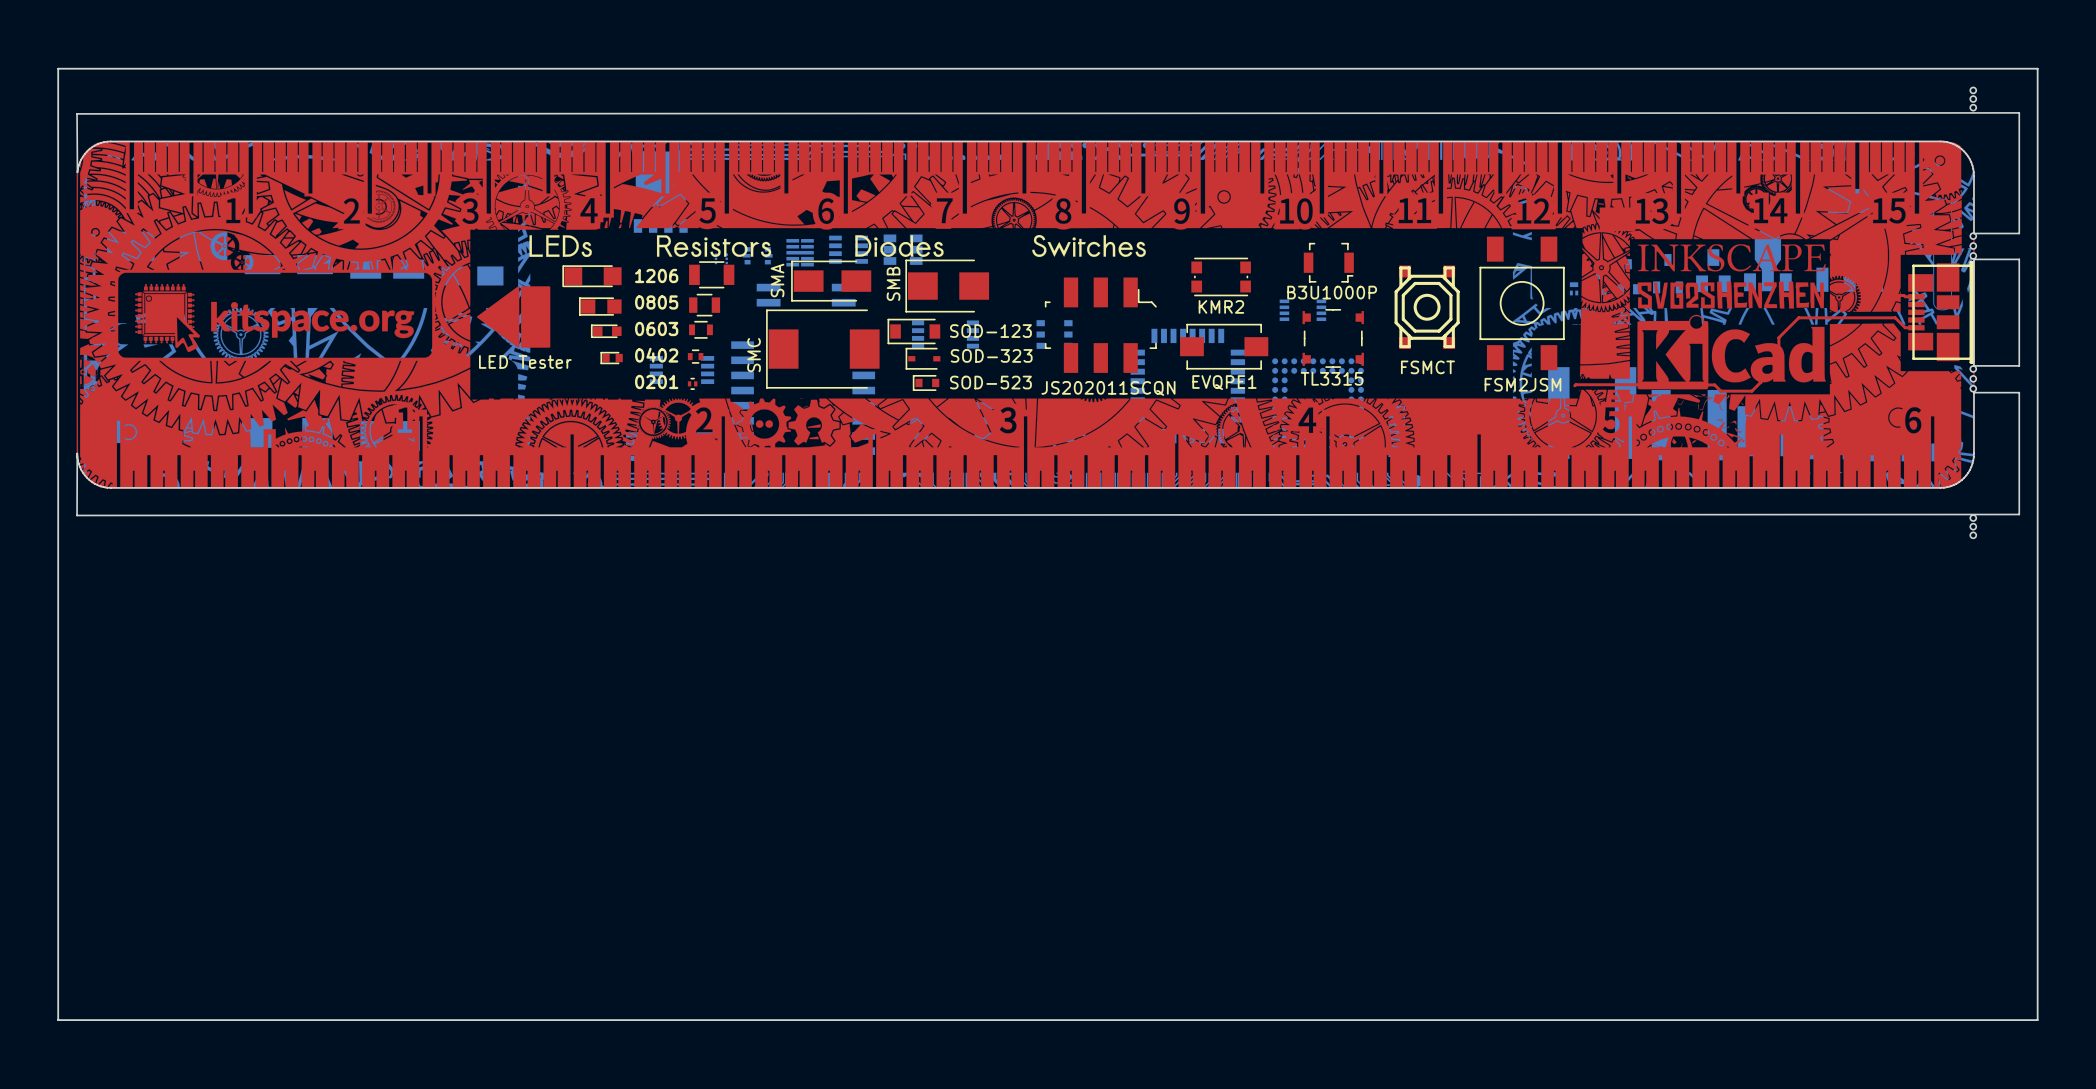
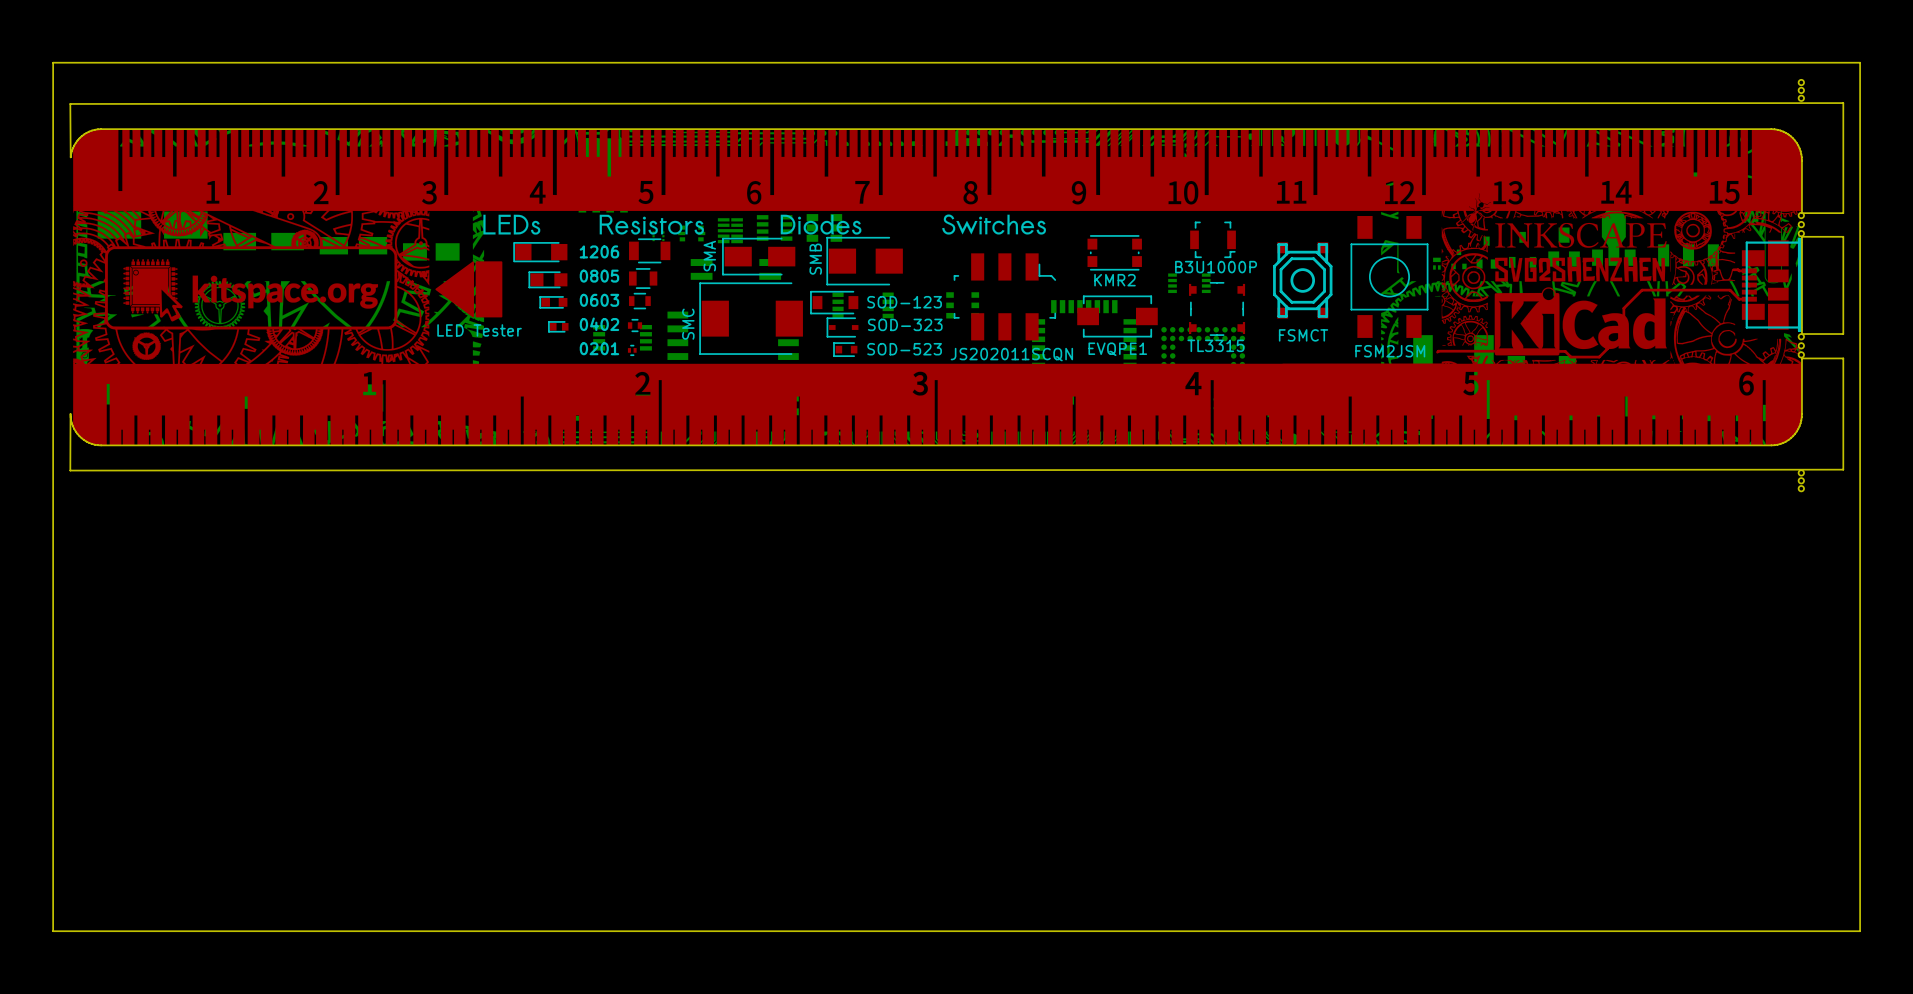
part footprint: [76, 87, 2020, 539] -> [69, 79, 1844, 492]

